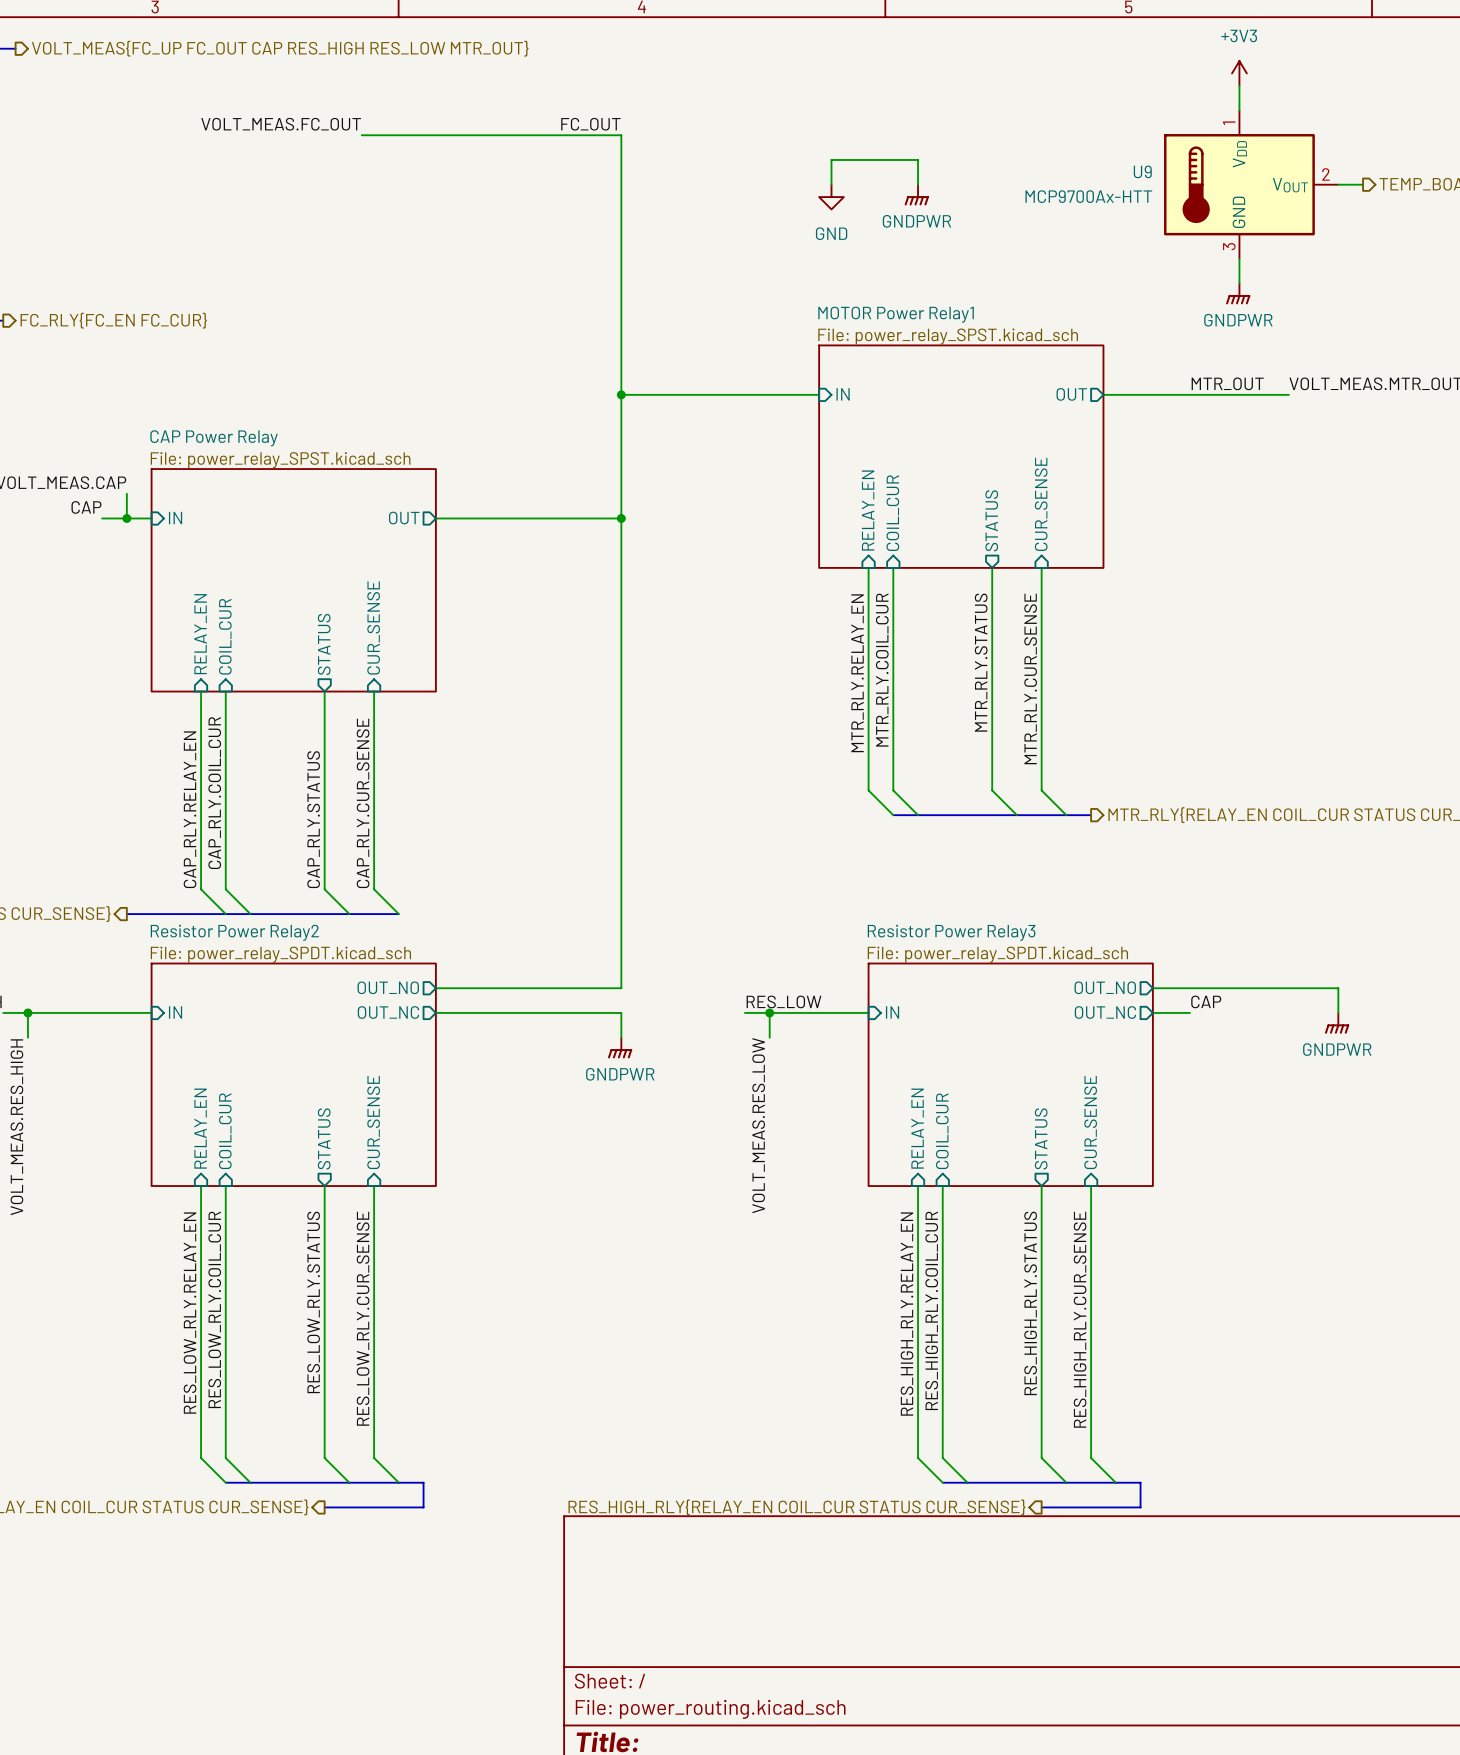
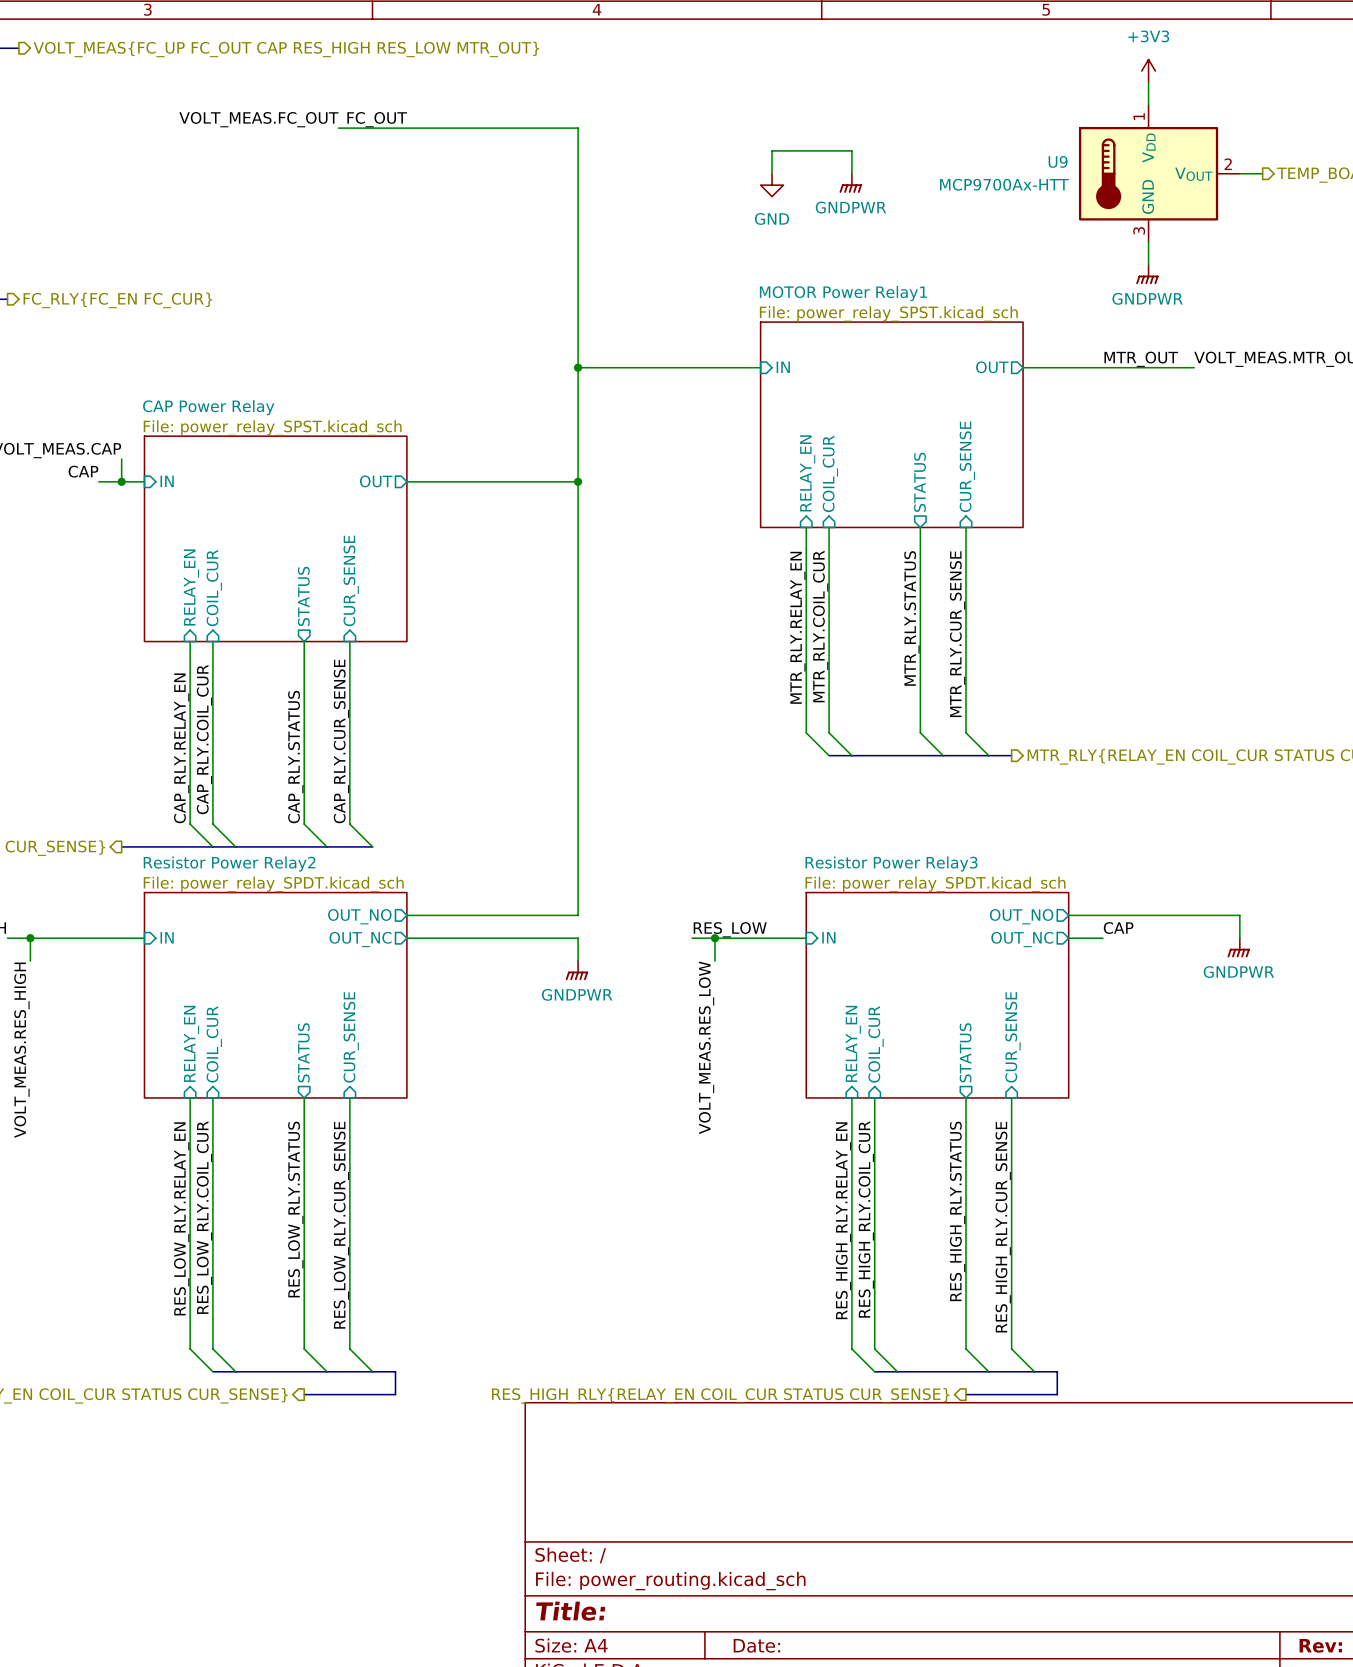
label position: FC_OUT (590, 124) -> FC_OUT (377, 119)

